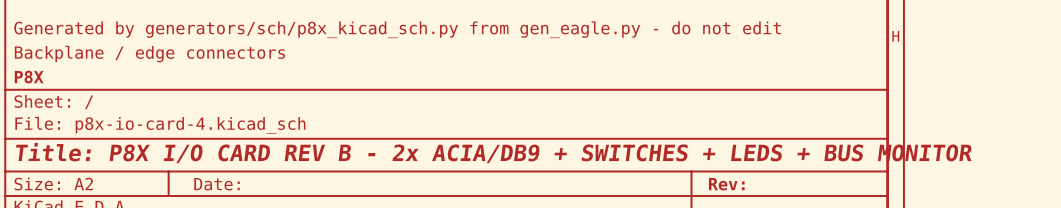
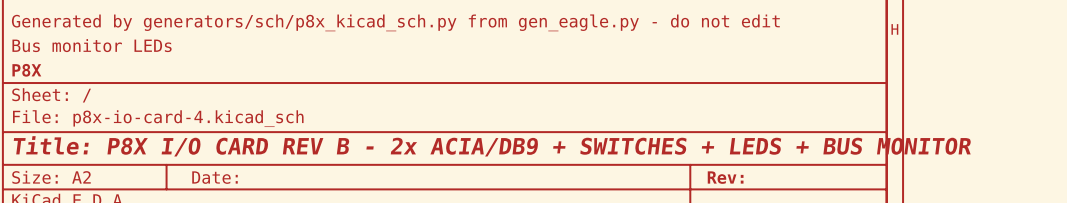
title block: Backplane / edge connectors (149, 54) -> Bus monitor LEDs (92, 45)

